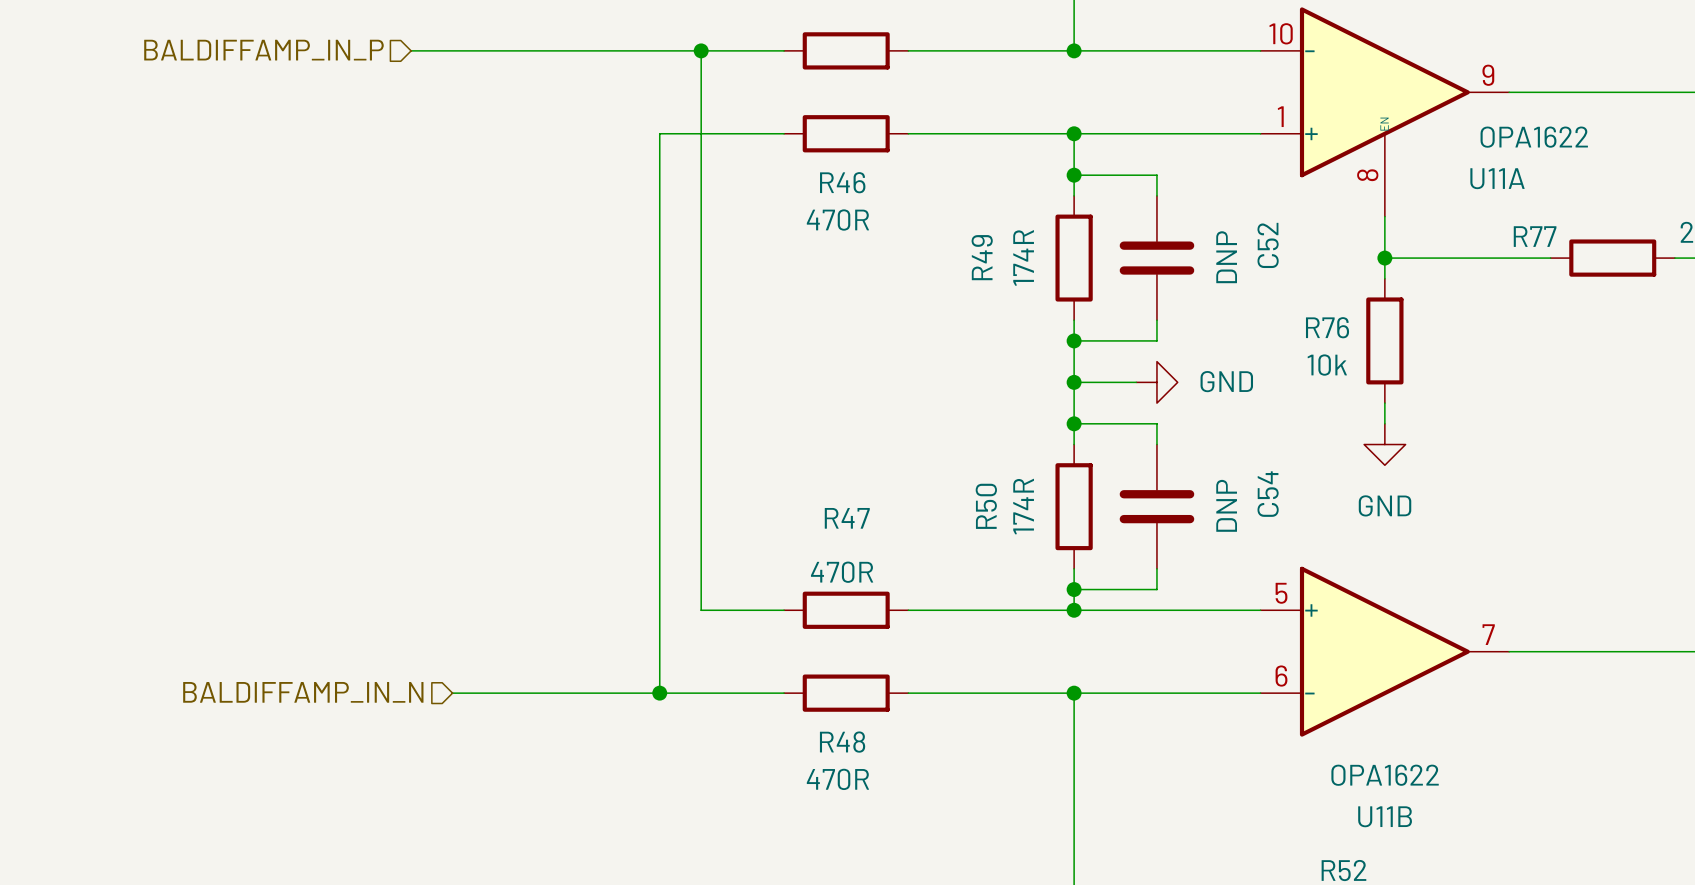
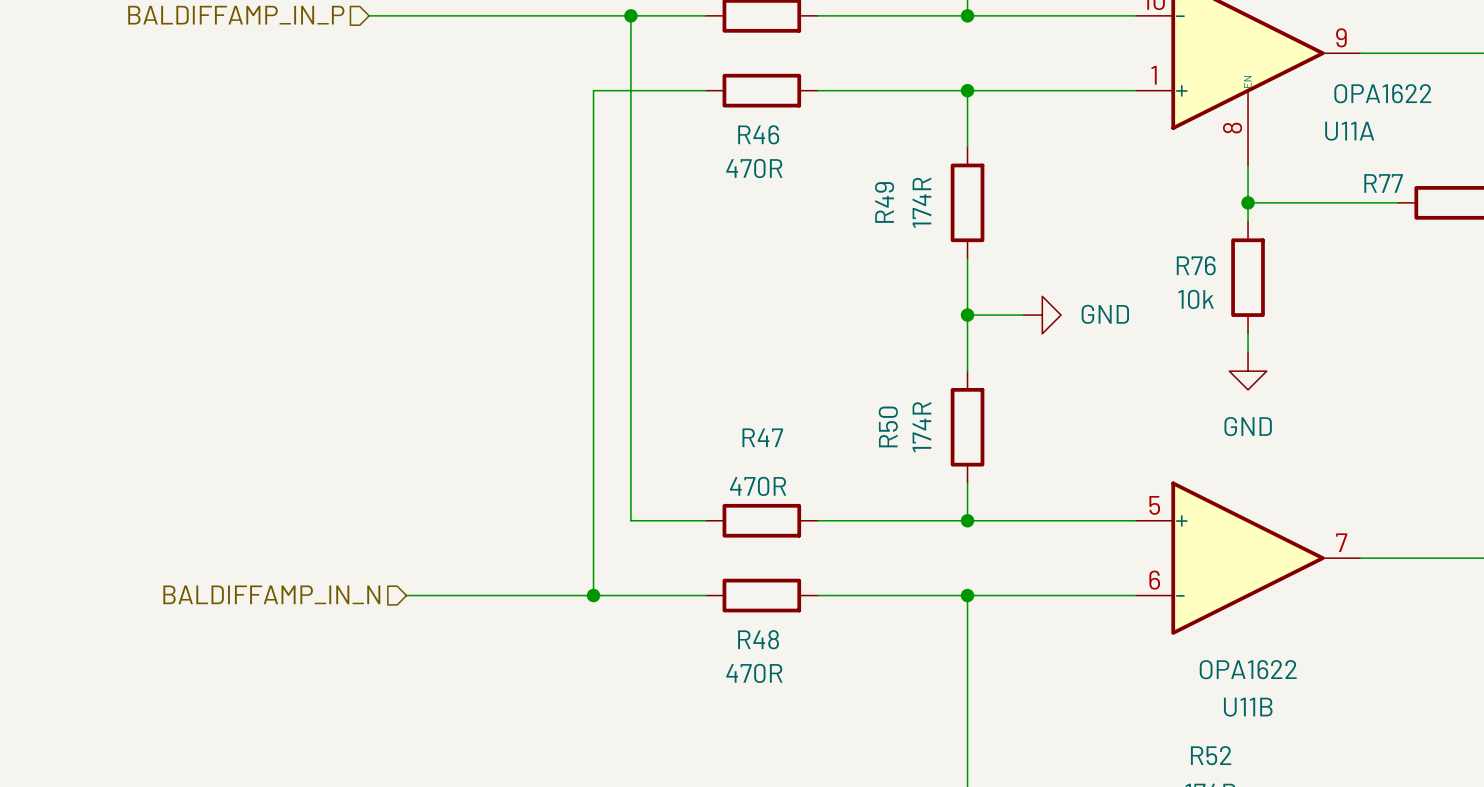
wire: (1074, 175) (1156, 175) (1156, 195) -> none
junction: (1074, 175) -> none
C52: DNP (1156, 258) -> none
wire: (1156, 320) (1156, 340) (1074, 340) -> none
junction: (1074, 340) -> none
wire: (1074, 423) (1156, 423) (1156, 444) -> none
junction: (1074, 423) -> none
C54: DNP (1156, 506) -> none
wire: (1156, 568) (1156, 589) (1074, 589) -> none
junction: (1074, 589) -> none

